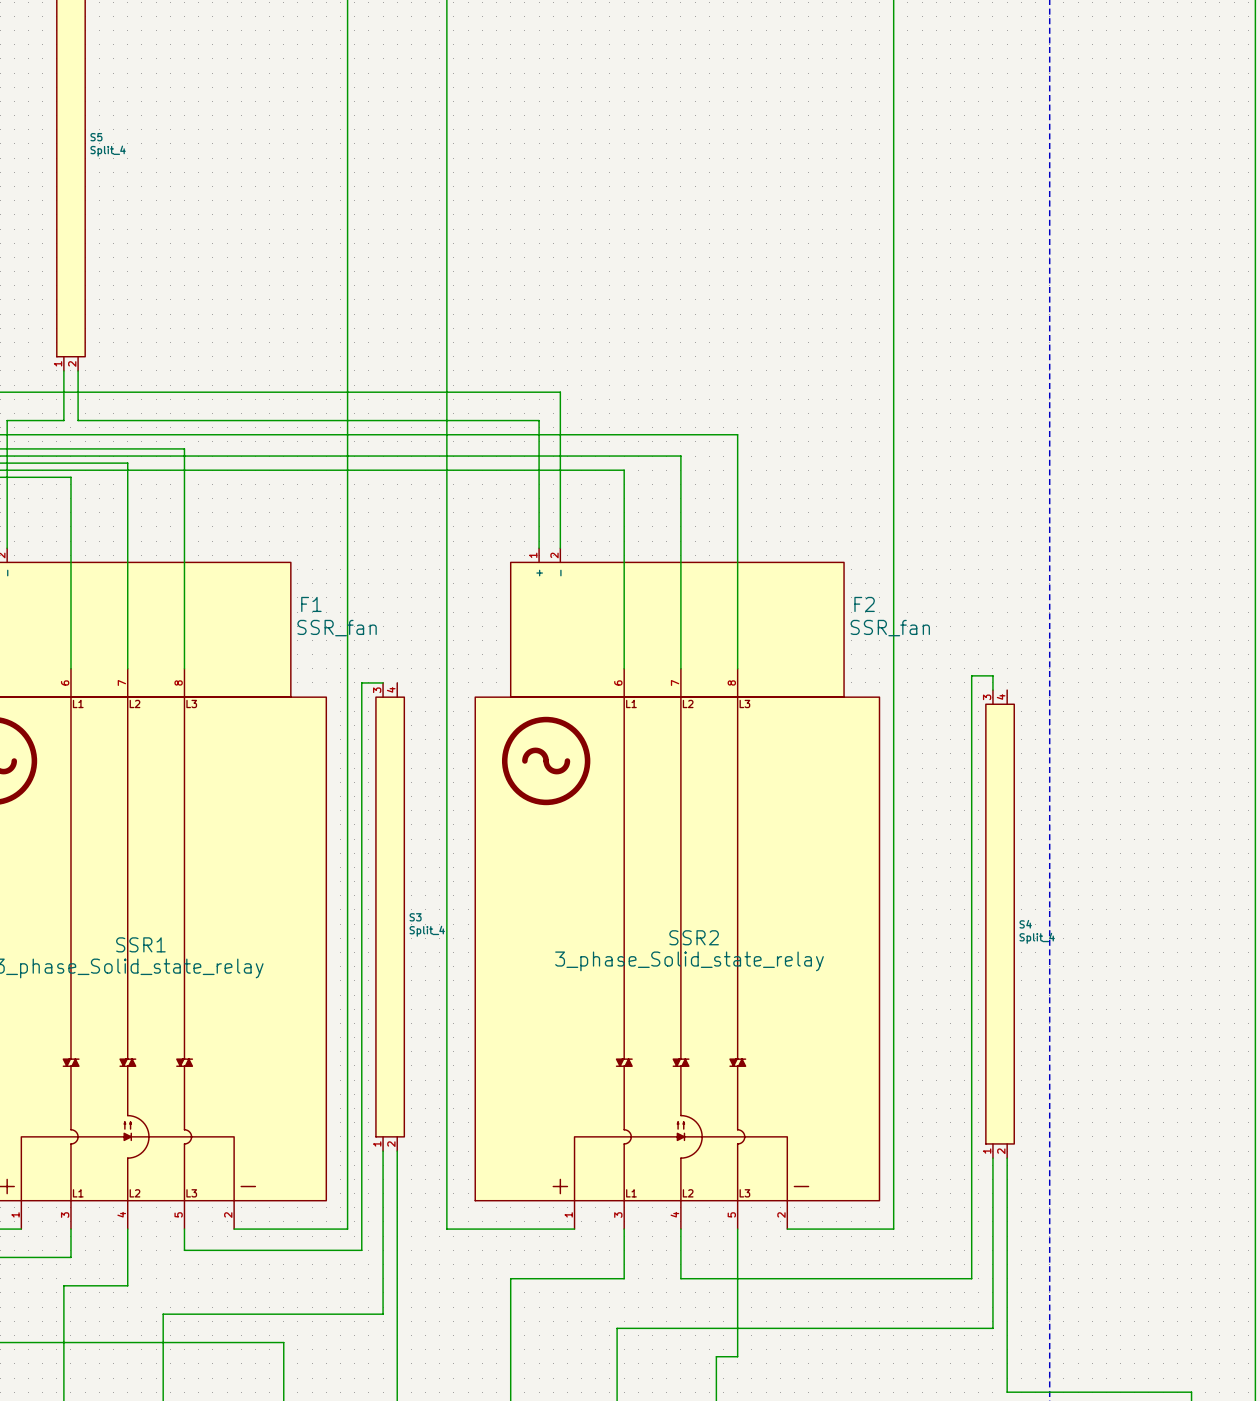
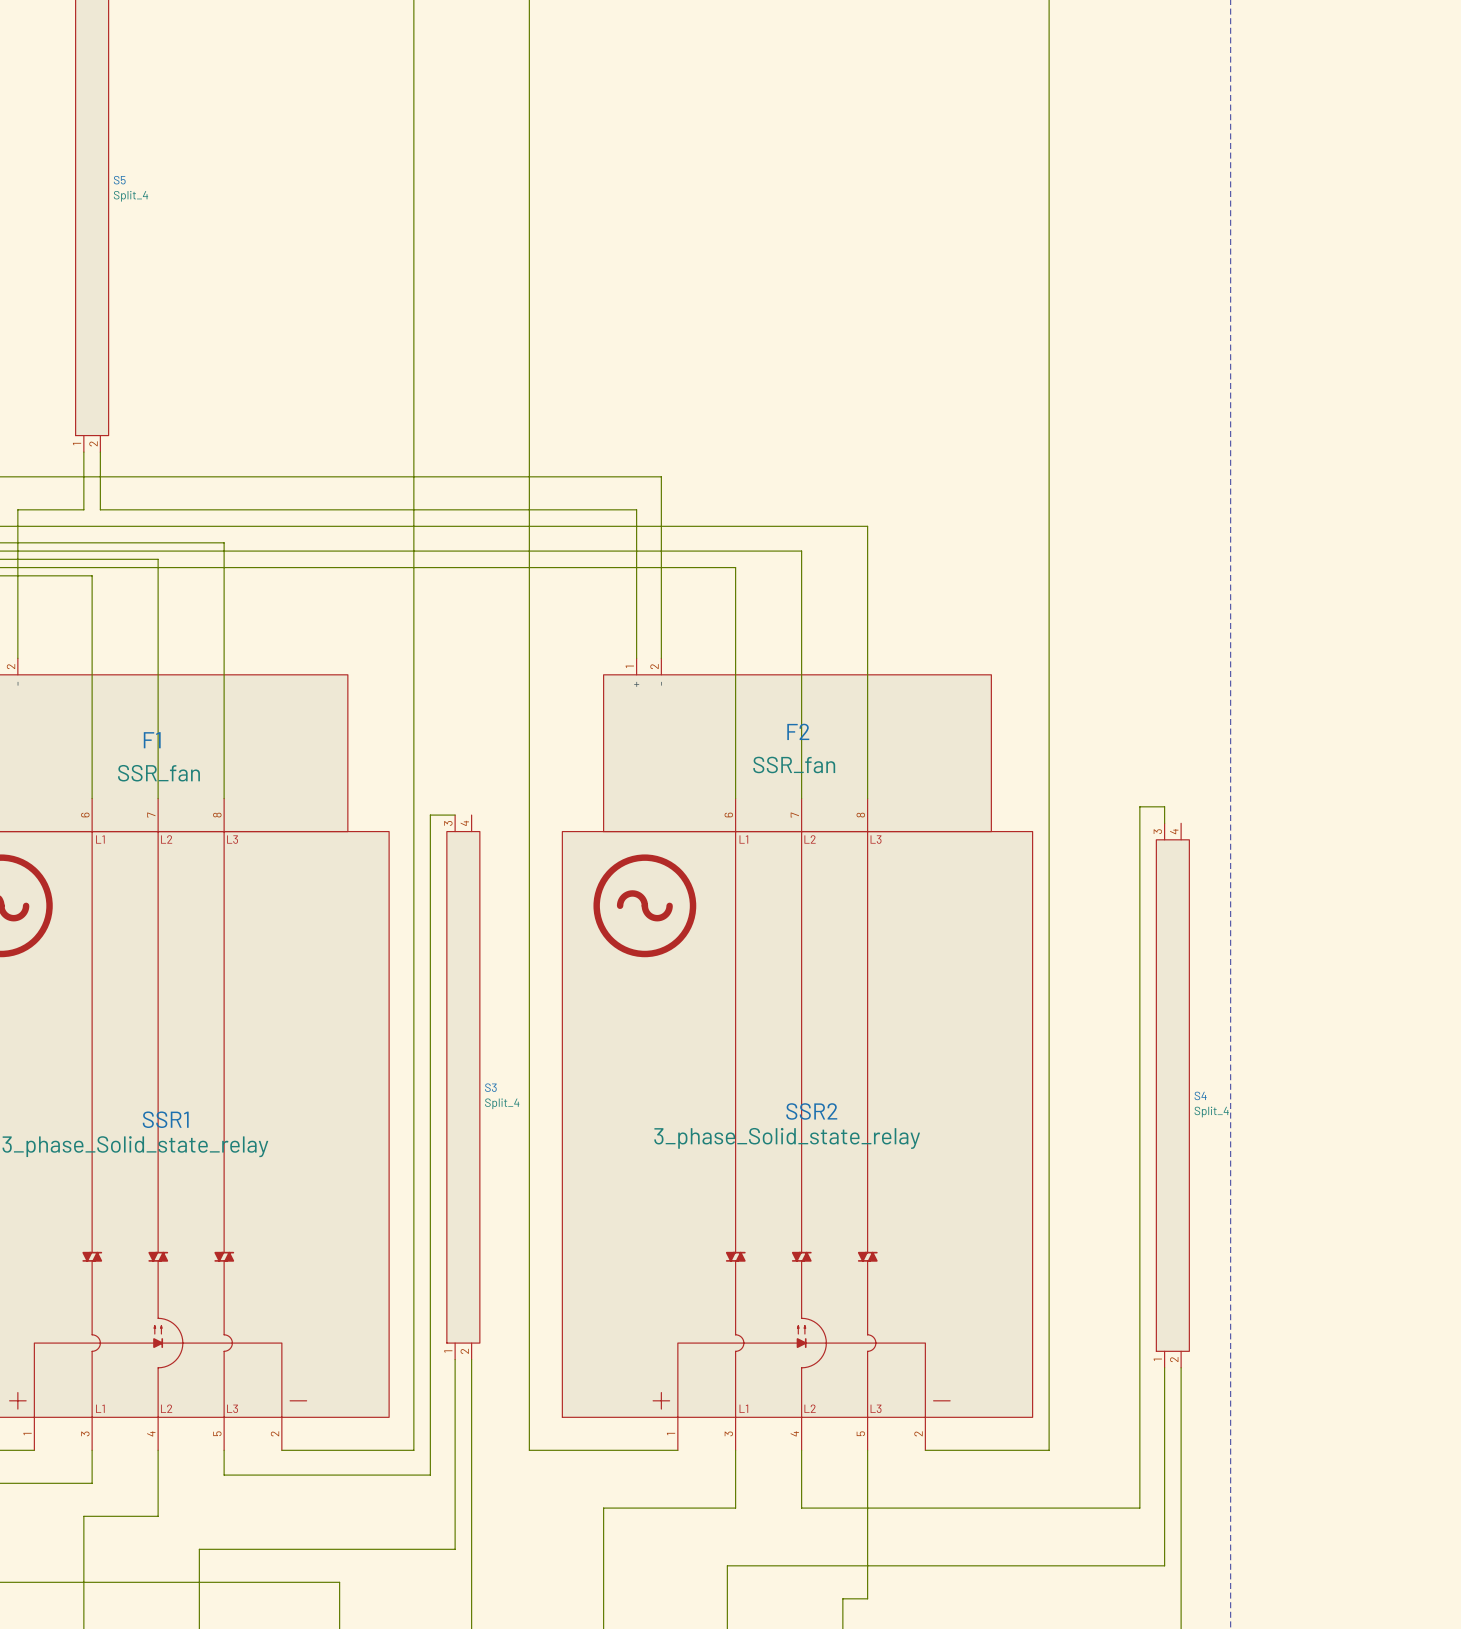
F1 name position: F1 (311, 604) -> F1 (152, 740)
F2 name position: F2 (864, 604) -> F2 (798, 731)
F1 value position: SSR_fan (337, 628) -> SSR_fan (159, 773)
F2 value position: SSR_fan (890, 628) -> SSR_fan (794, 764)

